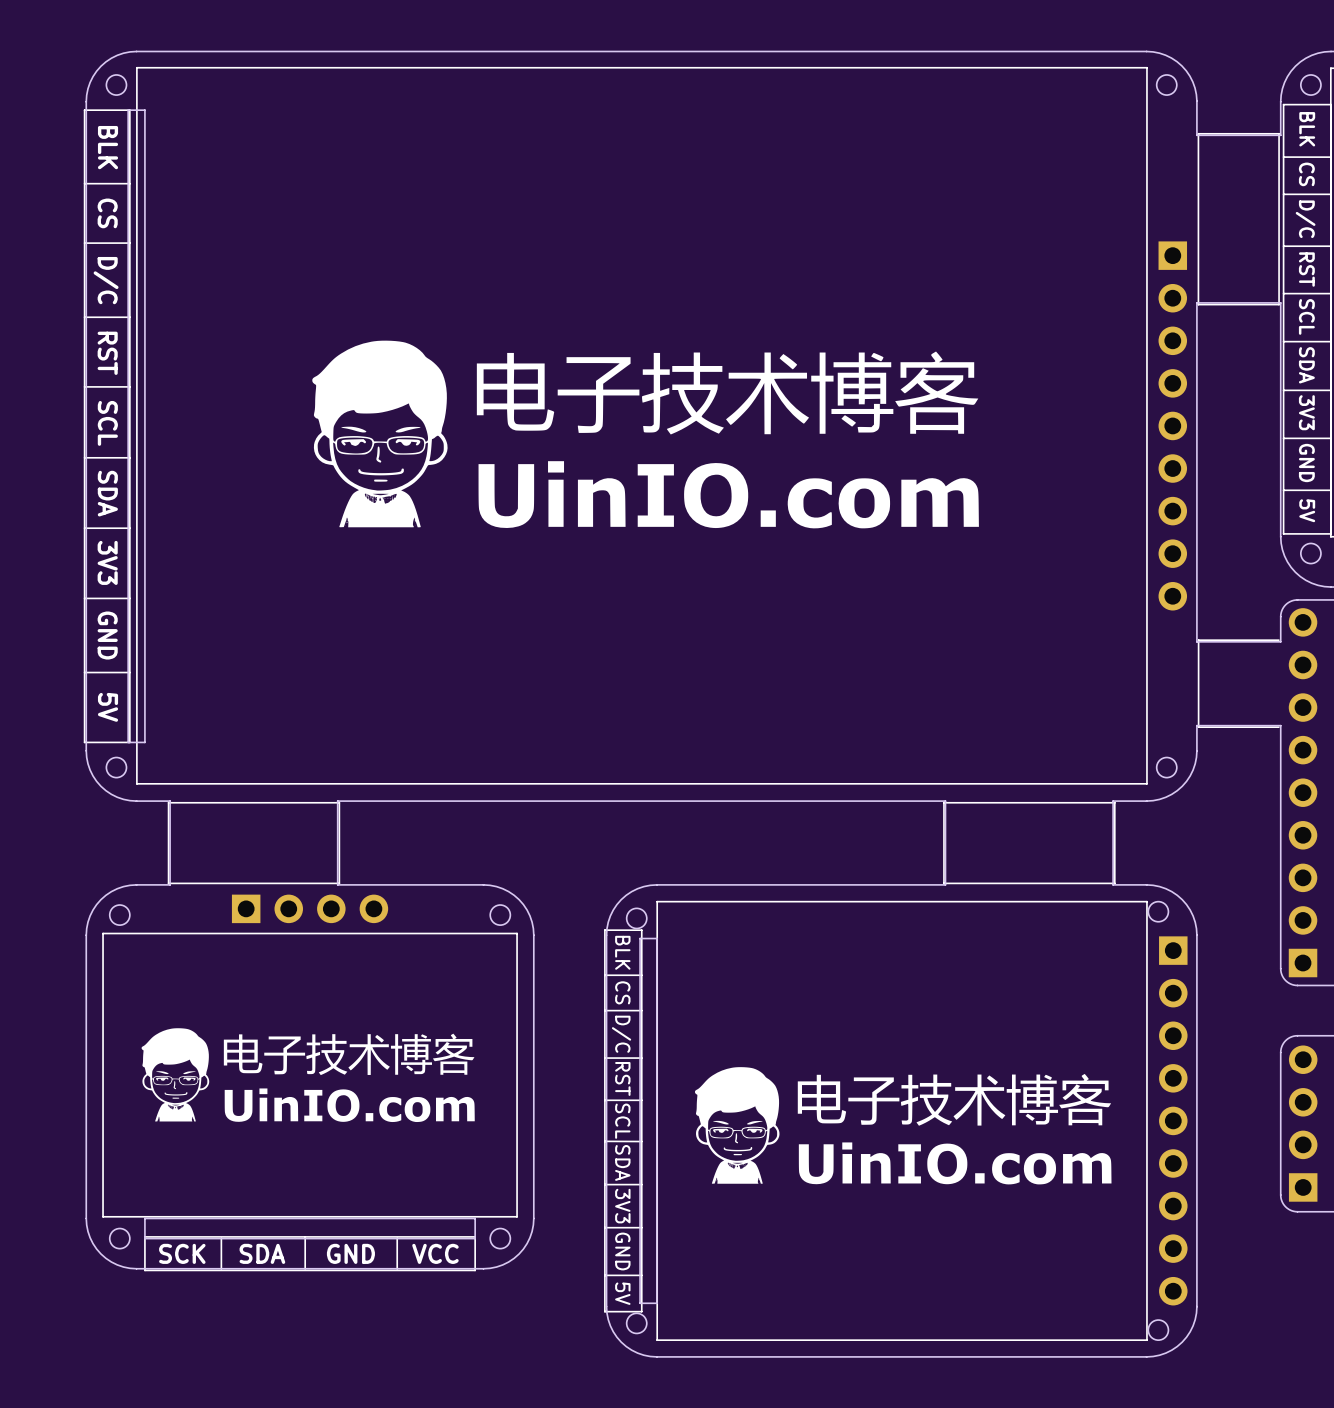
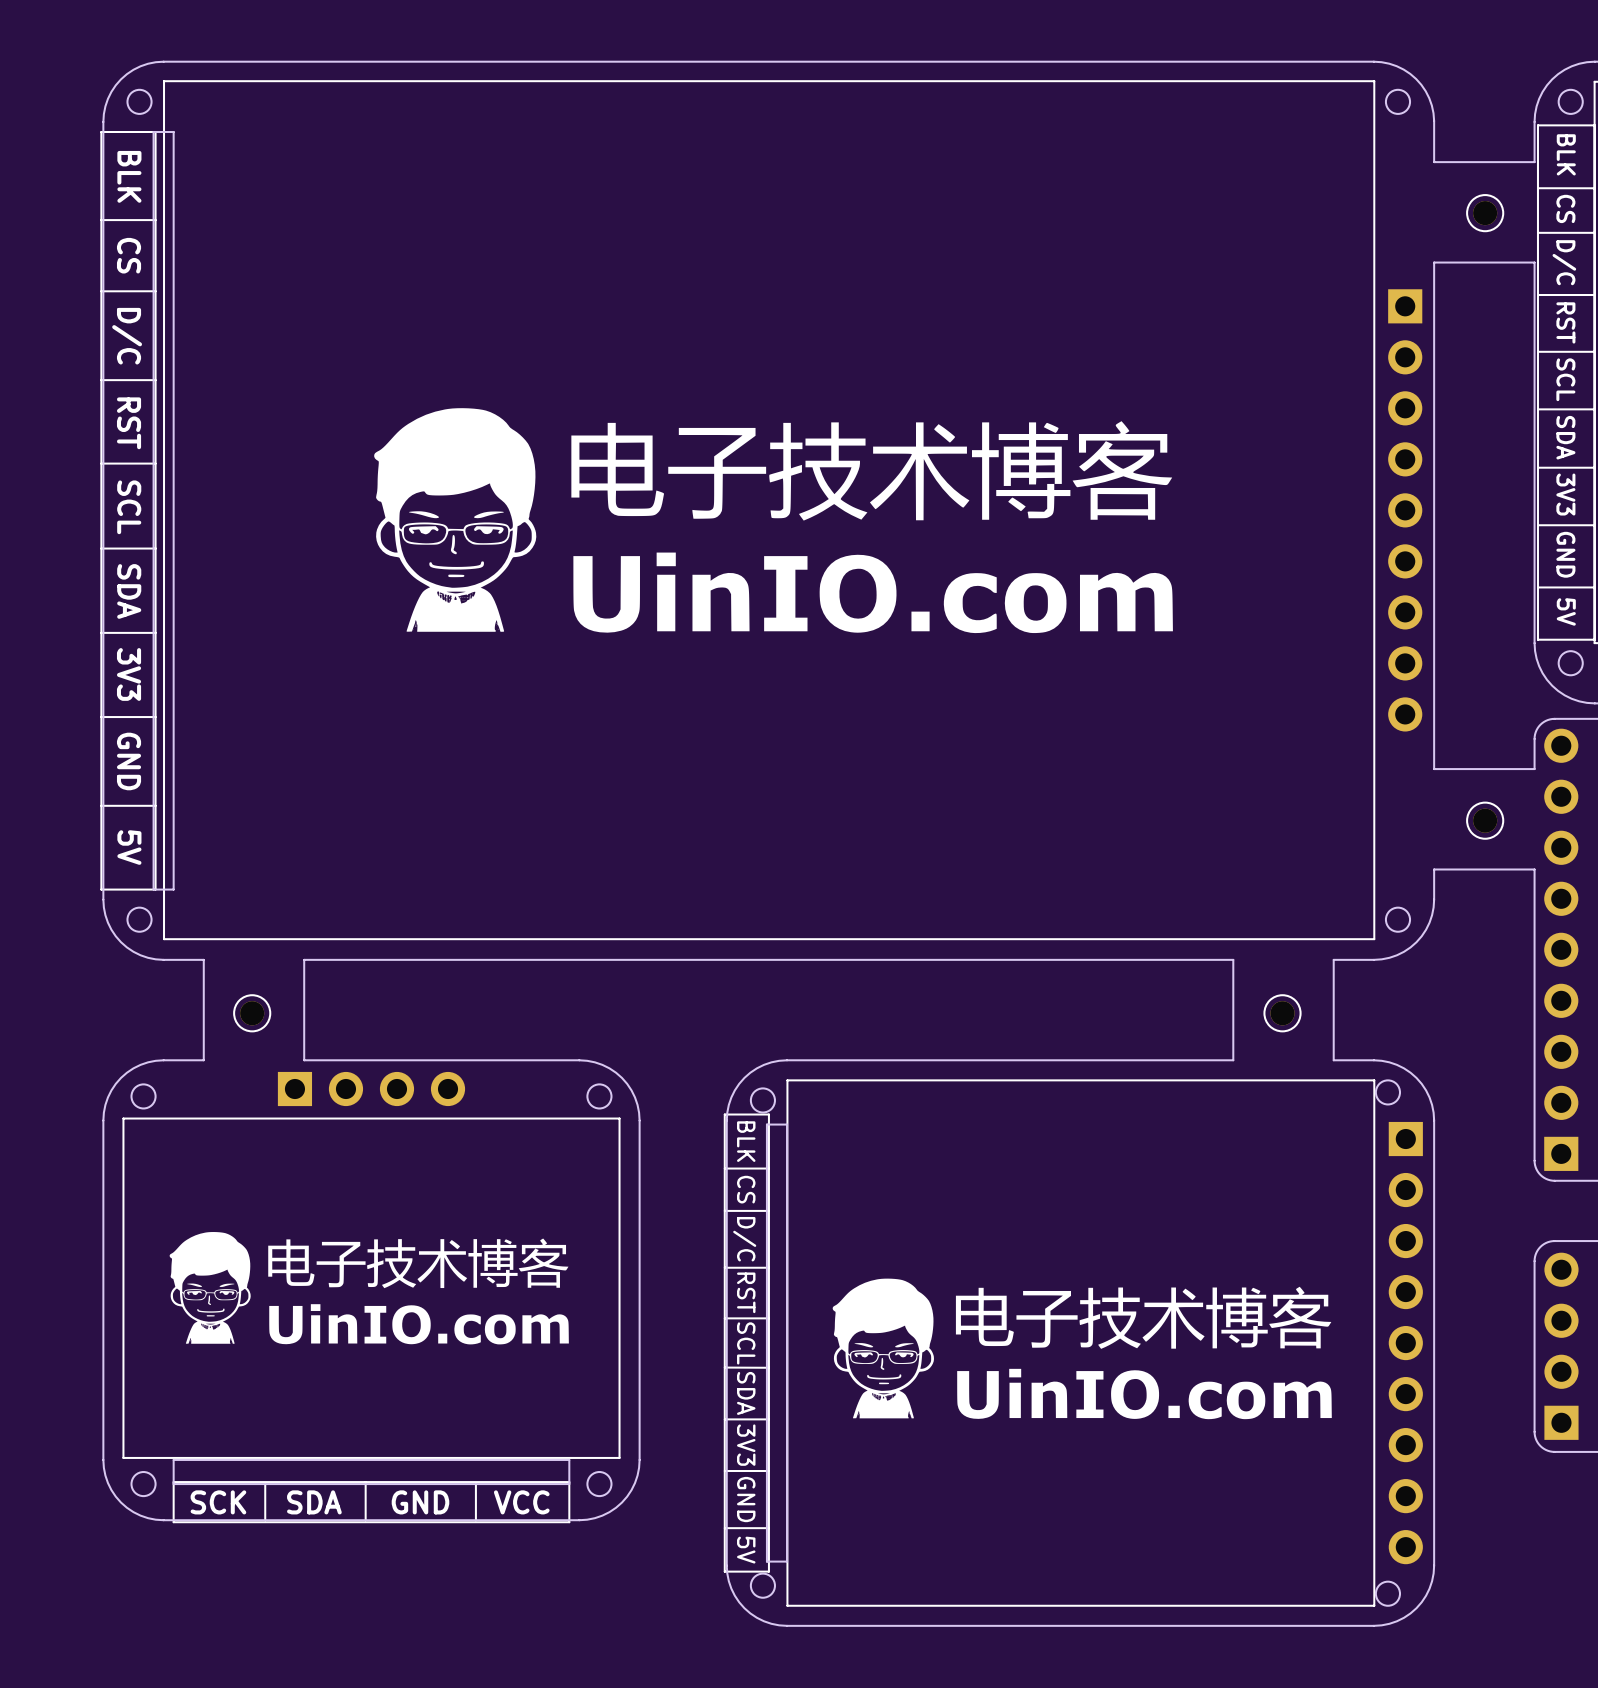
line: (1279, 133) (1198, 133) (1198, 304) (1279, 304) (1279, 133) -> none
part: none -> (1485, 213)
board edge: (1280, 302) (1196, 302) -> (1534, 362) (1534, 262) (1434, 262) (1434, 362)
line: (1278, 640) (1198, 640) (1198, 727) (1278, 727) -> none
part: none -> (1485, 820)
board edge: (337, 801) (337, 884) -> (404, 959) (304, 959) (304, 1060) (404, 1060)
board edge: (945, 801) (945, 884) -> (1132, 959) (1233, 959) (1233, 1060) (1132, 1060)
line: (339, 802) (168, 802) (168, 883) (339, 883) (339, 802) -> none
line: (1114, 802) (943, 802) (943, 883) (1114, 883) (1114, 802) -> none
part: none -> (252, 1013)
part: none -> (1282, 1013)

